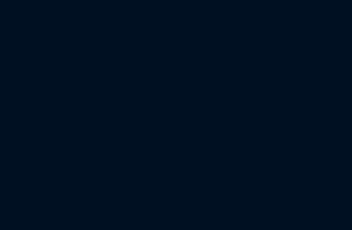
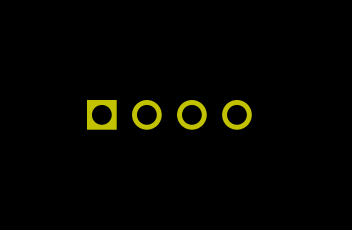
part: none -> (169, 114)

